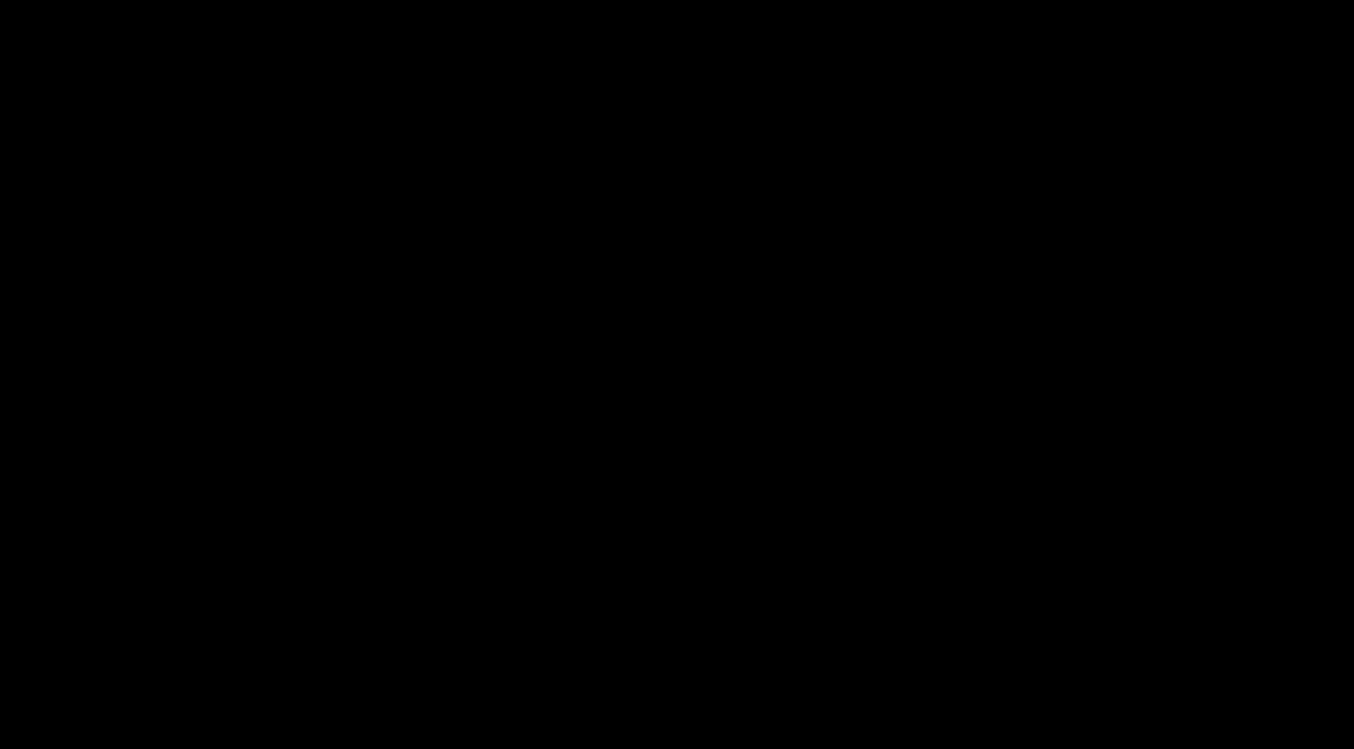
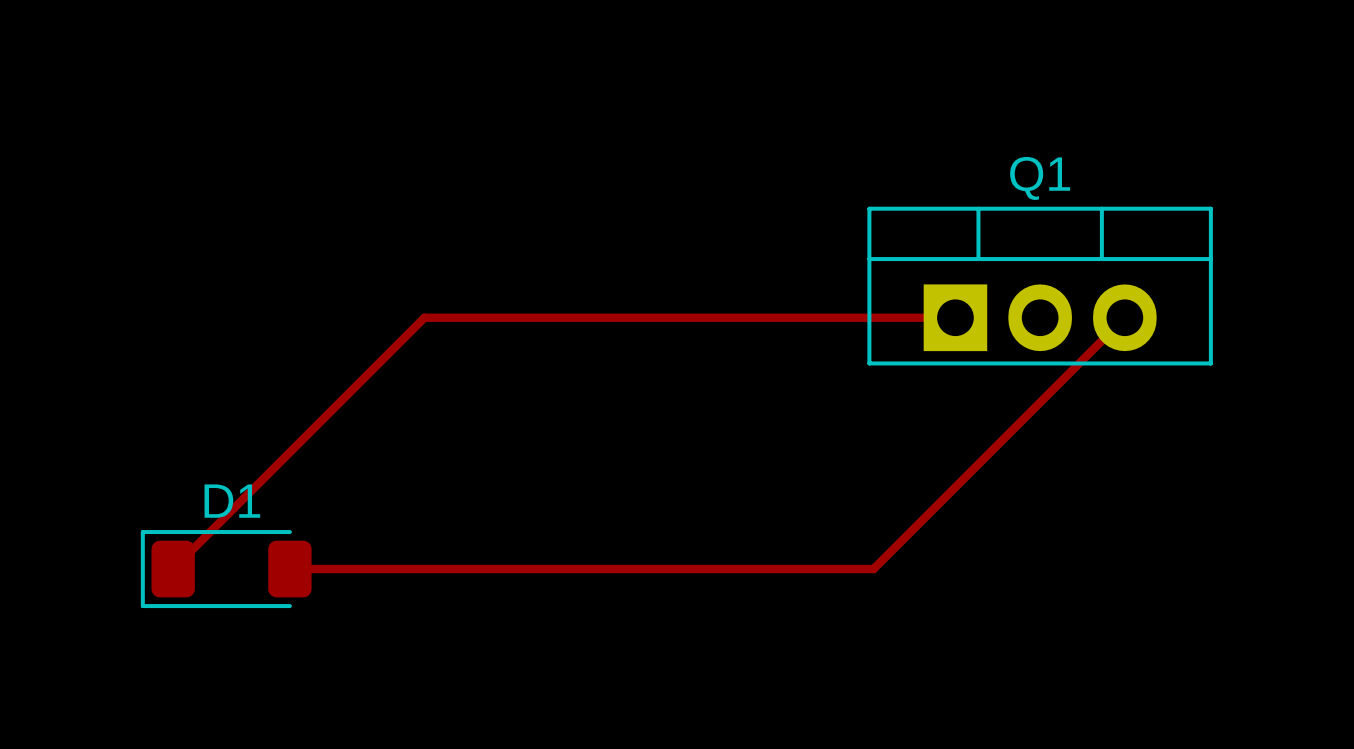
Q1: none -> (1040, 286)
track: none -> (955, 317) (424, 317) (173, 569)
track: none -> (1124, 317) (873, 569) (289, 569)
D1: none -> (226, 569)

